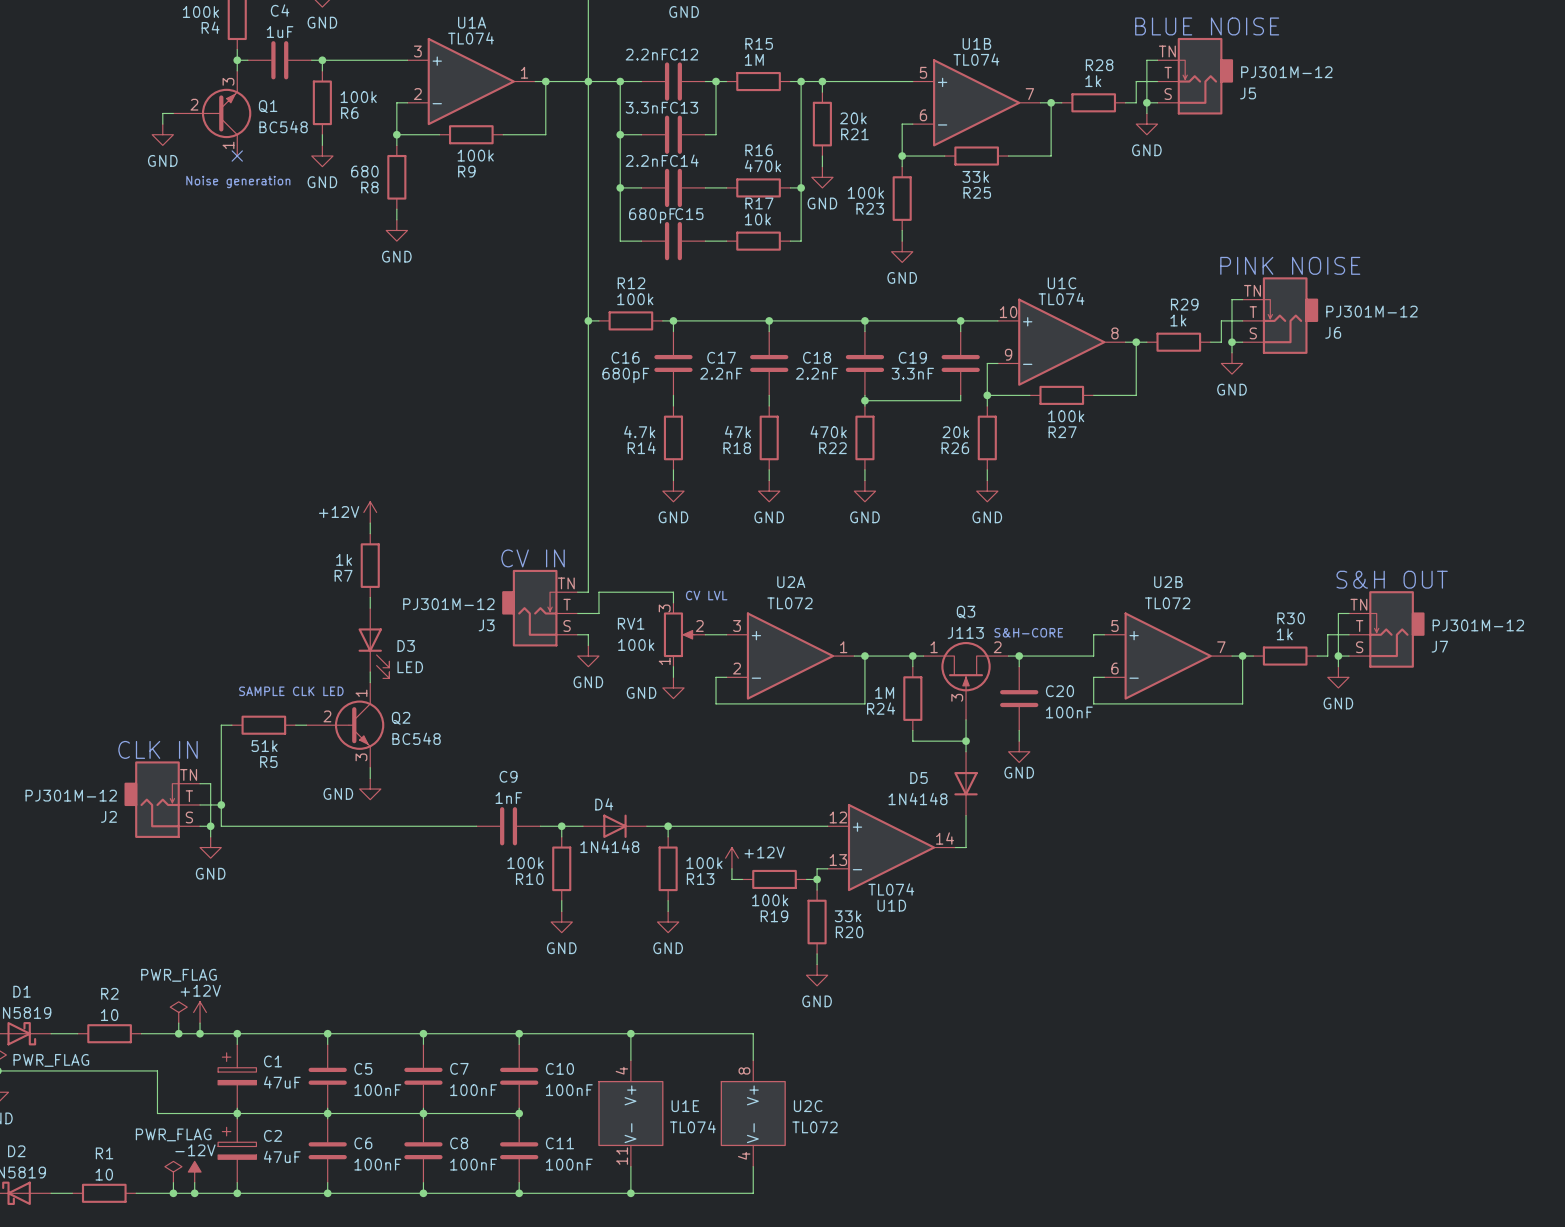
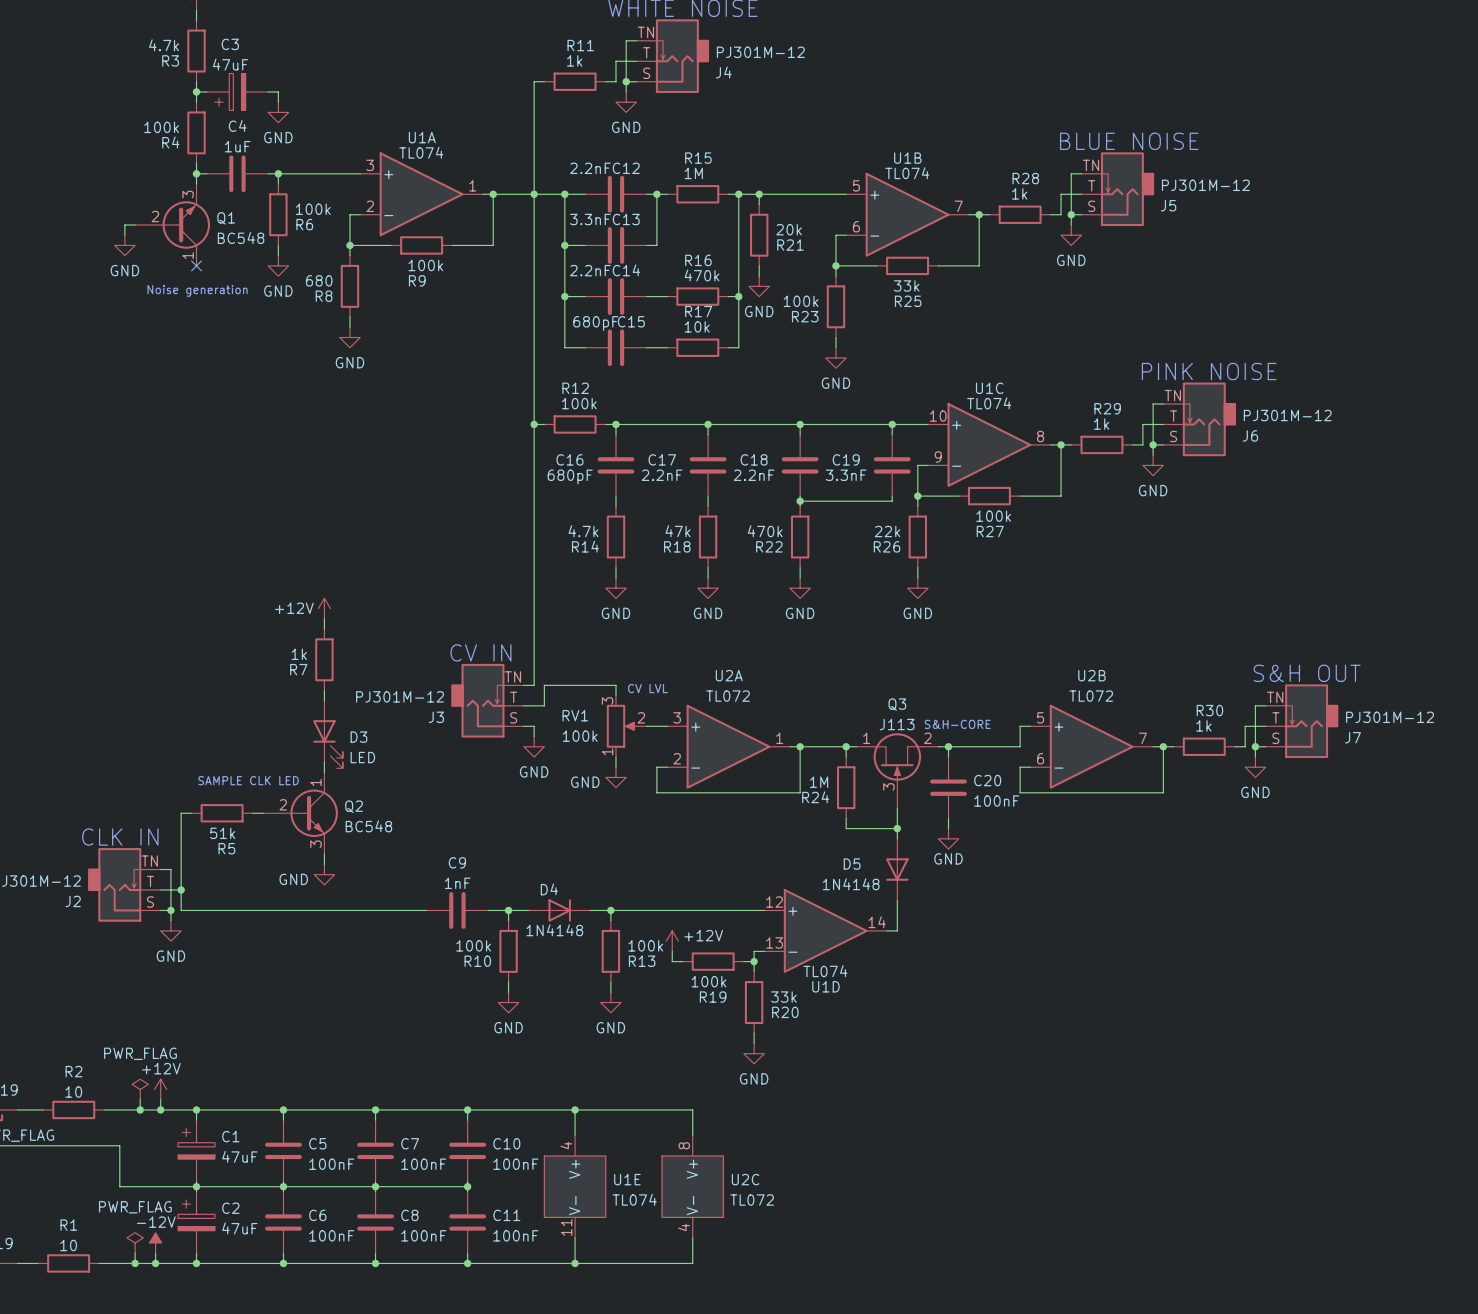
R26 value: 20k (955, 432) -> 22k (887, 531)

